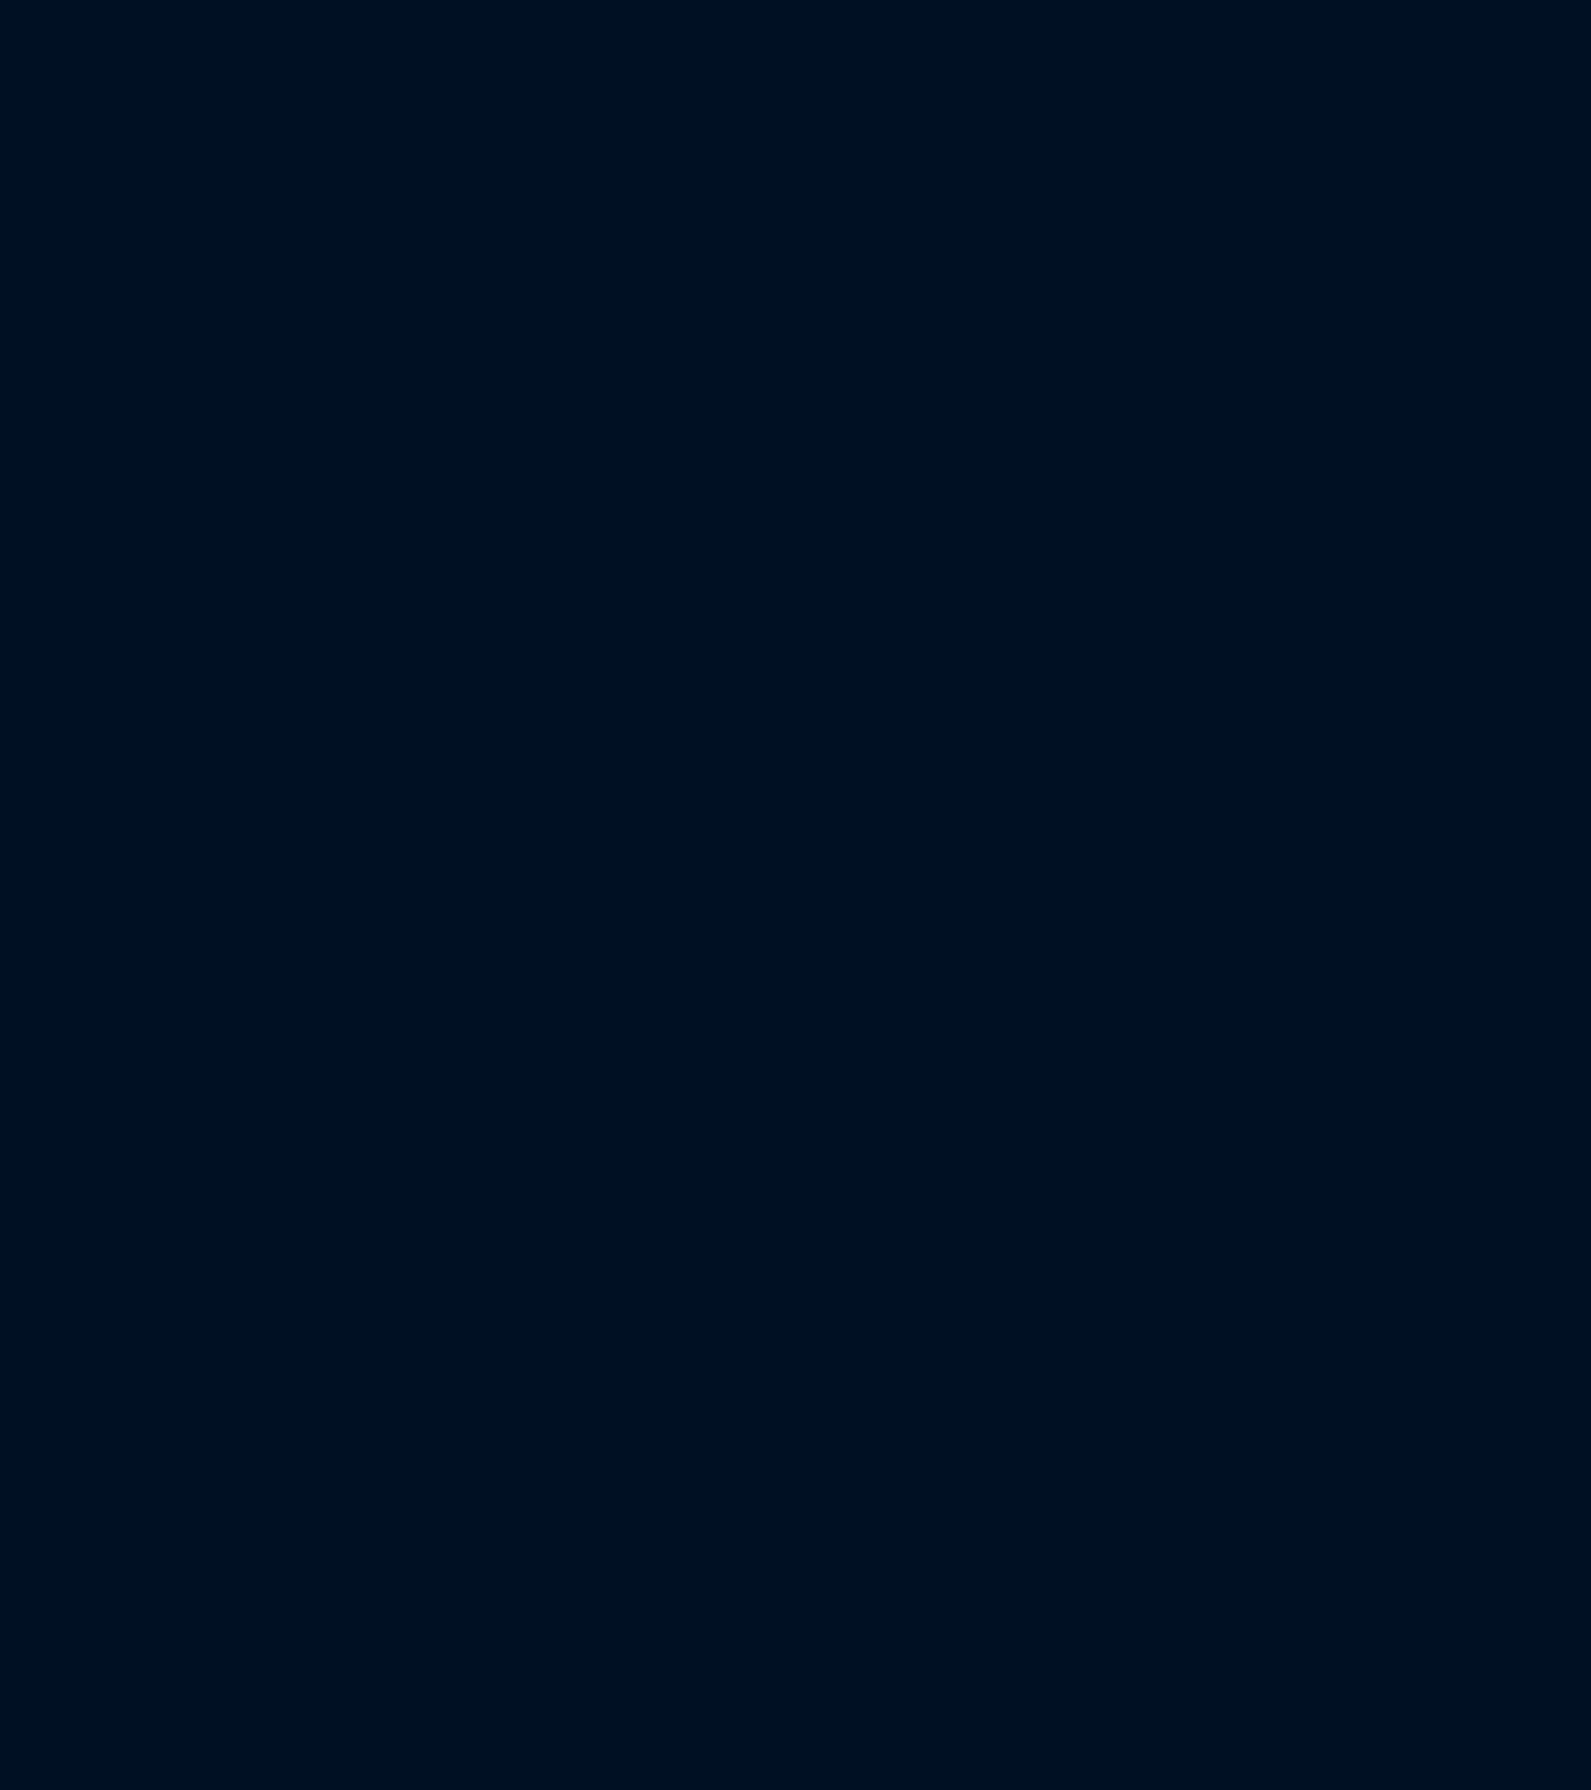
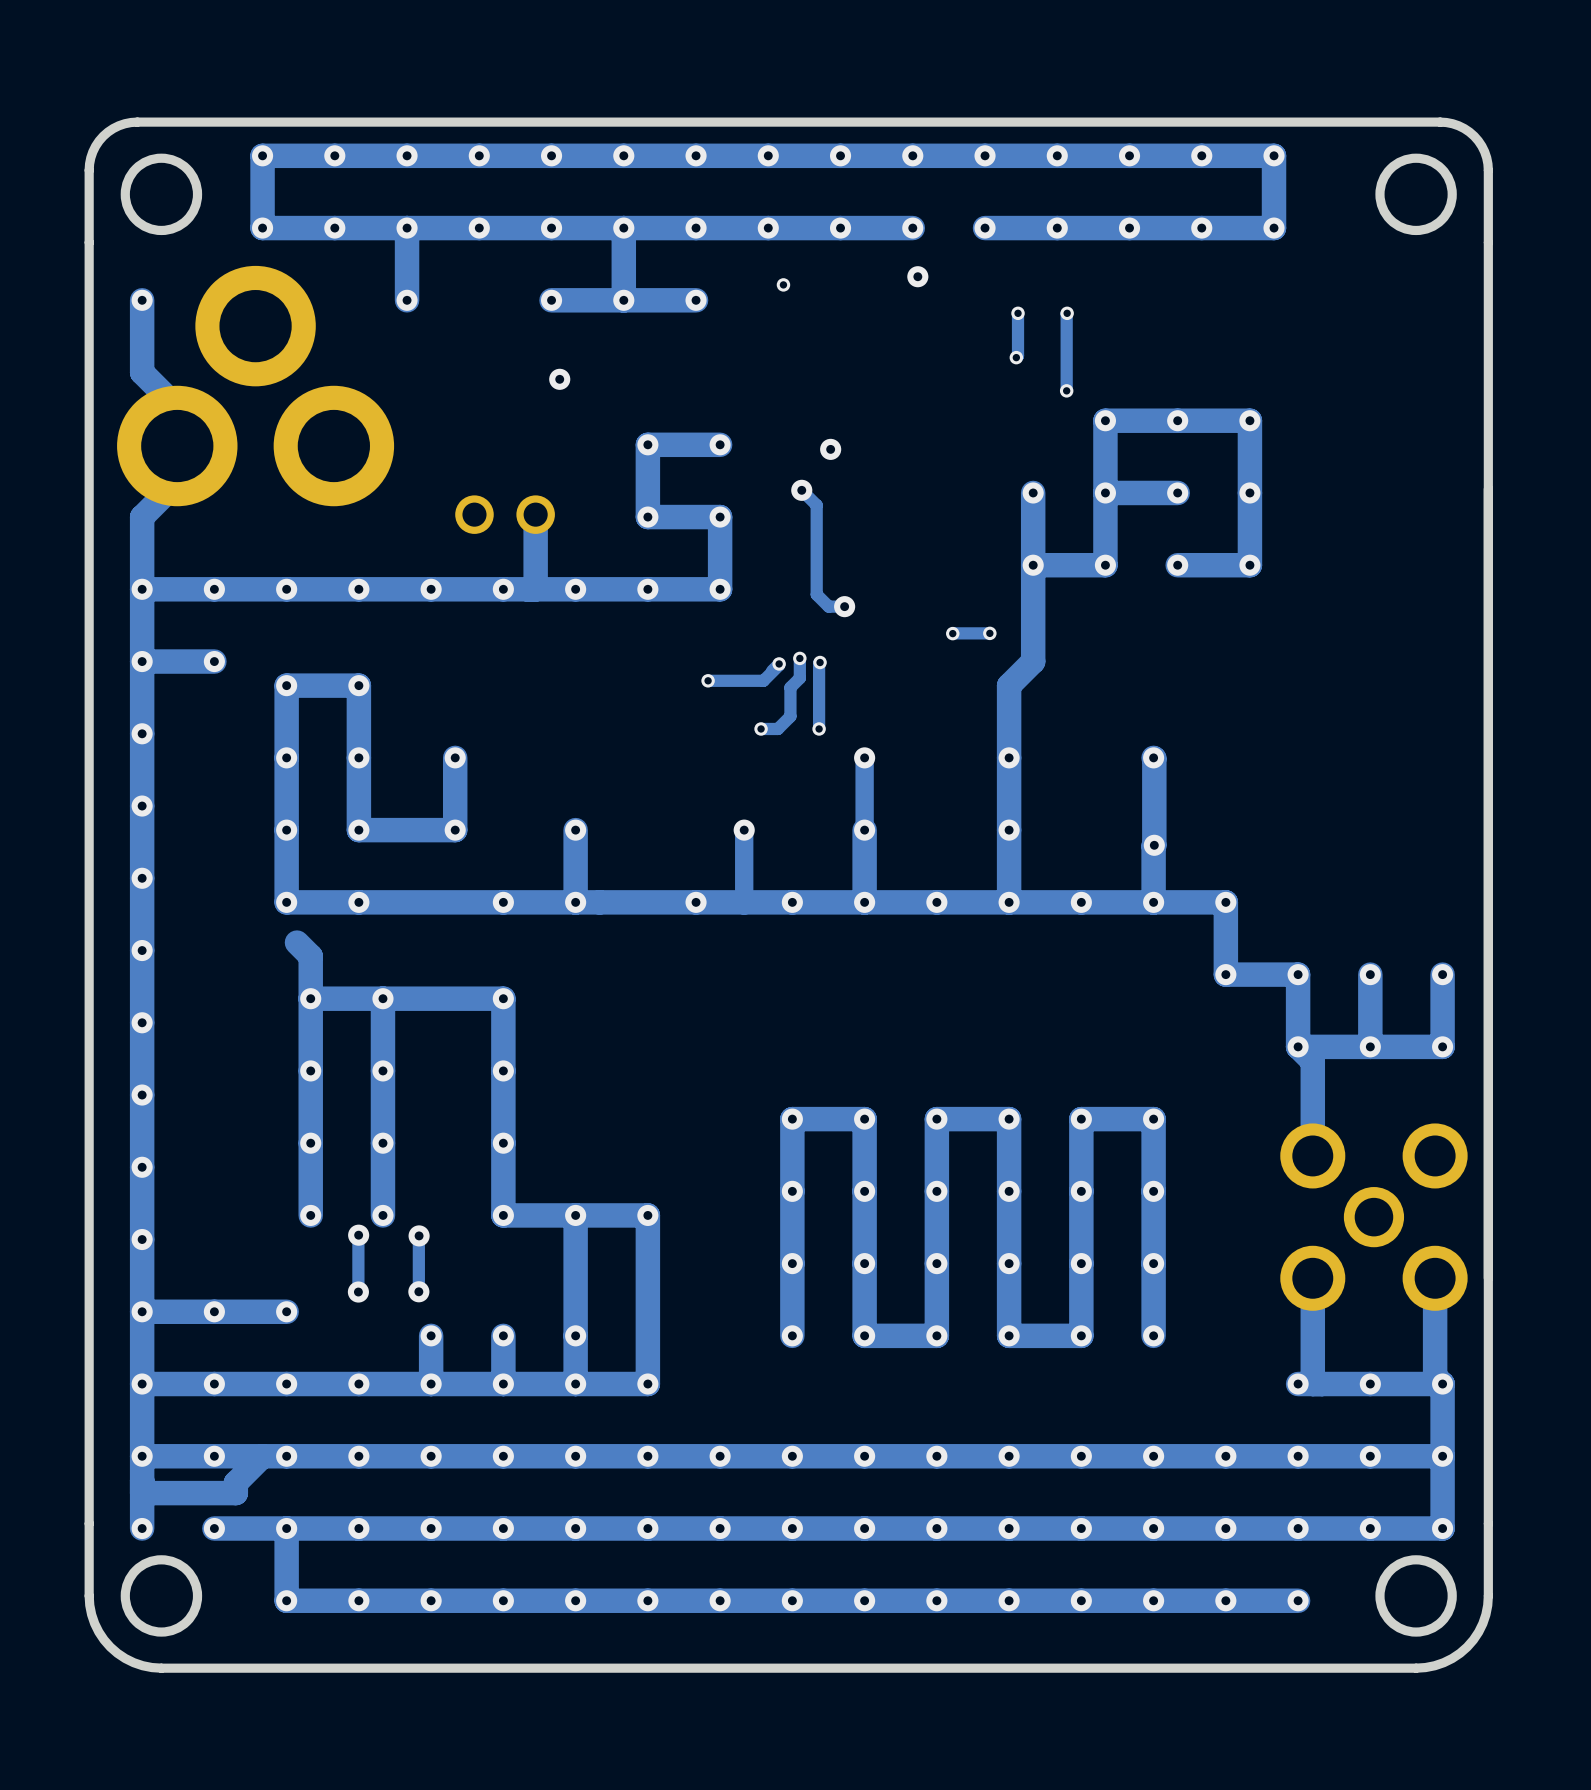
board edge: none -> (1440, 122) (137, 122) (124, 123) (113, 128) (99, 140) (92, 151) (89, 170) (89, 1595) (94, 1623) (104, 1639) (117, 1653) (133, 1662) (161, 1668) (1416, 1668) (1443, 1662) (1460, 1653) (1473, 1639) (1485, 1614) (1488, 1595) (1488, 170) (1484, 151) (1474, 136) (1458, 125) (1440, 122)
round board edge: none -> [120, 153, 203, 236]
round board edge: none -> [1375, 153, 1457, 236]
via: none -> (262, 155)
via: none -> (334, 155)
via: none -> (407, 155)
via: none -> (479, 155)
via: none -> (551, 155)
via: none -> (623, 155)
via: none -> (696, 155)
via: none -> (768, 155)
via: none -> (840, 155)
via: none -> (912, 155)
via: none -> (985, 155)
via: none -> (1057, 155)
via: none -> (1129, 155)
via: none -> (1201, 155)
via: none -> (1274, 155)
via: none -> (262, 228)
via: none -> (334, 228)
track: none -> (407, 228) (407, 300)
via: none -> (407, 228)
via: none -> (479, 228)
via: none -> (551, 228)
track: none -> (623, 228) (623, 300)
via: none -> (623, 228)
via: none -> (696, 228)
via: none -> (768, 228)
via: none -> (840, 228)
via: none -> (912, 228)
track: none -> (985, 228) (1274, 228) (1274, 155) (262, 155) (262, 228) (912, 228)
via: none -> (985, 228)
via: none -> (1057, 228)
via: none -> (1129, 228)
via: none -> (1201, 228)
via: none -> (1274, 228)
via: none -> (917, 276)
via: none -> (783, 284)
track: none -> (142, 300) (142, 372) (177, 407) (177, 481) (142, 517) (142, 1528)
via: none -> (142, 300)
via: none -> (407, 300)
via: none -> (551, 300)
via: none -> (623, 300)
track: none -> (696, 300) (551, 300)
via: none -> (696, 300)
track: none -> (1018, 313) (1018, 355) (1016, 357)
via: none -> (1018, 313)
track: none -> (1067, 313) (1066, 390)
via: none -> (1067, 313)
via: none -> (1016, 357)
via: none -> (559, 379)
part: none -> (255, 386)
via: none -> (1066, 390)
via: none -> (1105, 420)
via: none -> (1177, 420)
via: none -> (1249, 420)
via: none -> (647, 444)
track: none -> (720, 444) (647, 444) (647, 517) (720, 517) (720, 589) (142, 589)
via: none -> (720, 444)
via: none -> (830, 449)
track: none -> (801, 490) (816, 505) (816, 594) (828, 606) (844, 606)
via: none -> (801, 490)
track: none -> (1033, 492) (1033, 661) (1009, 685) (1009, 902)
via: none -> (1033, 492)
via: none -> (1105, 492)
track: none -> (1177, 492) (1105, 492)
via: none -> (1177, 492)
via: none -> (1249, 492)
part: none -> (505, 514)
track: none -> (535, 514) (535, 589)
via: none -> (647, 517)
via: none -> (720, 517)
via: none -> (1033, 565)
via: none -> (1105, 565)
track: none -> (1177, 565) (1249, 565) (1249, 420) (1105, 420) (1105, 565) (1033, 565)
via: none -> (1177, 565)
via: none -> (1249, 565)
via: none -> (142, 589)
via: none -> (214, 589)
via: none -> (286, 589)
via: none -> (358, 589)
via: none -> (431, 589)
via: none -> (503, 589)
via: none -> (575, 589)
via: none -> (647, 589)
via: none -> (720, 589)
via: none -> (844, 606)
via: none -> (952, 633)
track: none -> (989, 633) (953, 633)
via: none -> (989, 633)
track: none -> (799, 658) (799, 678) (790, 687) (790, 716) (777, 728) (761, 728)
via: none -> (799, 658)
via: none -> (142, 661)
track: none -> (214, 661) (142, 661)
via: none -> (214, 661)
track: none -> (820, 662) (819, 728)
via: none -> (820, 662)
via: none -> (779, 663)
track: none -> (772, 670) (779, 663) (763, 680) (708, 680)
via: none -> (708, 680)
via: none -> (286, 685)
via: none -> (358, 685)
via: none -> (761, 728)
via: none -> (819, 728)
via: none -> (142, 733)
via: none -> (286, 757)
via: none -> (358, 757)
track: none -> (455, 757) (455, 830) (358, 830) (358, 685) (286, 685) (286, 902) (1225, 902) (1225, 974) (1298, 974) (1298, 1046)
via: none -> (455, 757)
track: none -> (864, 757) (864, 902)
via: none -> (864, 757)
via: none -> (1009, 757)
track: none -> (1153, 757) (1153, 902)
via: none -> (1153, 757)
via: none -> (142, 806)
via: none -> (286, 830)
via: none -> (358, 830)
via: none -> (455, 830)
track: none -> (575, 830) (575, 902)
via: none -> (575, 830)
track: none -> (744, 830) (744, 902)
via: none -> (744, 830)
via: none -> (864, 830)
via: none -> (1009, 830)
via: none -> (1154, 845)
via: none -> (142, 878)
via: none -> (286, 902)
via: none -> (358, 902)
via: none -> (503, 902)
via: none -> (575, 902)
via: none -> (696, 902)
via: none -> (792, 902)
via: none -> (864, 902)
via: none -> (936, 902)
via: none -> (1009, 902)
via: none -> (1081, 902)
via: none -> (1153, 902)
via: none -> (1225, 902)
track: none -> (297, 942) (310, 956) (310, 1215)
via: none -> (142, 950)
via: none -> (1225, 974)
via: none -> (1298, 974)
track: none -> (1370, 974) (1370, 1046)
via: none -> (1370, 974)
track: none -> (1442, 974) (1442, 1046) (1298, 1046)
via: none -> (1442, 974)
track: none -> (310, 998) (503, 998) (503, 1215) (647, 1215) (647, 1384) (142, 1384)
via: none -> (310, 998)
track: none -> (382, 998) (382, 1215)
via: none -> (382, 998)
via: none -> (503, 998)
via: none -> (142, 1022)
track: none -> (1298, 1046) (1312, 1061) (1312, 1155)
via: none -> (1298, 1046)
via: none -> (1370, 1046)
via: none -> (1442, 1046)
via: none -> (310, 1070)
via: none -> (382, 1070)
via: none -> (503, 1070)
via: none -> (142, 1095)
via: none -> (792, 1119)
via: none -> (864, 1119)
via: none -> (936, 1119)
via: none -> (1009, 1119)
via: none -> (1081, 1119)
via: none -> (1153, 1119)
via: none -> (310, 1143)
via: none -> (382, 1143)
via: none -> (503, 1143)
via: none -> (142, 1167)
via: none -> (792, 1191)
via: none -> (864, 1191)
via: none -> (936, 1191)
via: none -> (1009, 1191)
via: none -> (1081, 1191)
via: none -> (1153, 1191)
via: none -> (310, 1215)
via: none -> (382, 1215)
via: none -> (503, 1215)
track: none -> (575, 1215) (575, 1384)
via: none -> (575, 1215)
via: none -> (647, 1215)
part: none -> (1373, 1217)
track: none -> (358, 1235) (358, 1292)
via: none -> (358, 1235)
via: none -> (419, 1235)
track: none -> (418, 1236) (418, 1291)
via: none -> (142, 1239)
via: none -> (792, 1263)
via: none -> (864, 1263)
via: none -> (936, 1263)
via: none -> (1009, 1263)
via: none -> (1081, 1263)
via: none -> (1153, 1263)
track: none -> (1312, 1278) (1312, 1384)
track: none -> (1435, 1278) (1435, 1376) (1442, 1384)
via: none -> (418, 1291)
via: none -> (358, 1292)
via: none -> (142, 1311)
via: none -> (214, 1311)
track: none -> (286, 1311) (142, 1311)
via: none -> (286, 1311)
track: none -> (431, 1335) (431, 1384)
via: none -> (431, 1335)
track: none -> (503, 1335) (503, 1384)
via: none -> (503, 1335)
via: none -> (575, 1335)
via: none -> (792, 1335)
via: none -> (864, 1335)
via: none -> (936, 1335)
via: none -> (1009, 1335)
via: none -> (1081, 1335)
track: none -> (1153, 1335) (1153, 1119) (1081, 1119) (1081, 1335) (1009, 1335) (1009, 1119) (936, 1119) (936, 1335) (864, 1335) (864, 1119) (792, 1119) (792, 1335)
via: none -> (1153, 1335)
via: none -> (142, 1384)
via: none -> (214, 1384)
via: none -> (286, 1384)
via: none -> (358, 1384)
via: none -> (431, 1384)
via: none -> (503, 1384)
via: none -> (575, 1384)
via: none -> (647, 1384)
via: none -> (1298, 1384)
via: none -> (1370, 1384)
track: none -> (1442, 1384) (1298, 1384)
track: none -> (1442, 1384) (1442, 1528) (214, 1528)
via: none -> (1442, 1384)
via: none -> (142, 1456)
via: none -> (214, 1456)
track: none -> (262, 1456) (235, 1482) (235, 1493) (142, 1493)
via: none -> (286, 1456)
via: none -> (358, 1456)
via: none -> (431, 1456)
via: none -> (503, 1456)
via: none -> (575, 1456)
via: none -> (647, 1456)
via: none -> (720, 1456)
via: none -> (792, 1456)
via: none -> (864, 1456)
via: none -> (936, 1456)
via: none -> (1009, 1456)
via: none -> (1081, 1456)
via: none -> (1153, 1456)
via: none -> (1225, 1456)
via: none -> (1298, 1456)
via: none -> (1370, 1456)
track: none -> (1442, 1456) (142, 1456)
via: none -> (1442, 1456)
via: none -> (142, 1528)
via: none -> (214, 1528)
track: none -> (286, 1528) (286, 1600) (1298, 1600)
via: none -> (286, 1528)
via: none -> (358, 1528)
via: none -> (431, 1528)
via: none -> (503, 1528)
via: none -> (575, 1528)
via: none -> (647, 1528)
via: none -> (720, 1528)
via: none -> (792, 1528)
via: none -> (864, 1528)
via: none -> (936, 1528)
via: none -> (1009, 1528)
via: none -> (1081, 1528)
via: none -> (1153, 1528)
via: none -> (1225, 1528)
via: none -> (1298, 1528)
via: none -> (1370, 1528)
via: none -> (1442, 1528)
round board edge: none -> [120, 1555, 203, 1637]
round board edge: none -> [1375, 1555, 1457, 1637]
via: none -> (286, 1600)
via: none -> (358, 1600)
via: none -> (431, 1600)
via: none -> (503, 1600)
via: none -> (575, 1600)
via: none -> (647, 1600)
via: none -> (720, 1600)
via: none -> (792, 1600)
via: none -> (864, 1600)
via: none -> (936, 1600)
via: none -> (1009, 1600)
via: none -> (1081, 1600)
via: none -> (1153, 1600)
via: none -> (1225, 1600)
via: none -> (1298, 1600)

